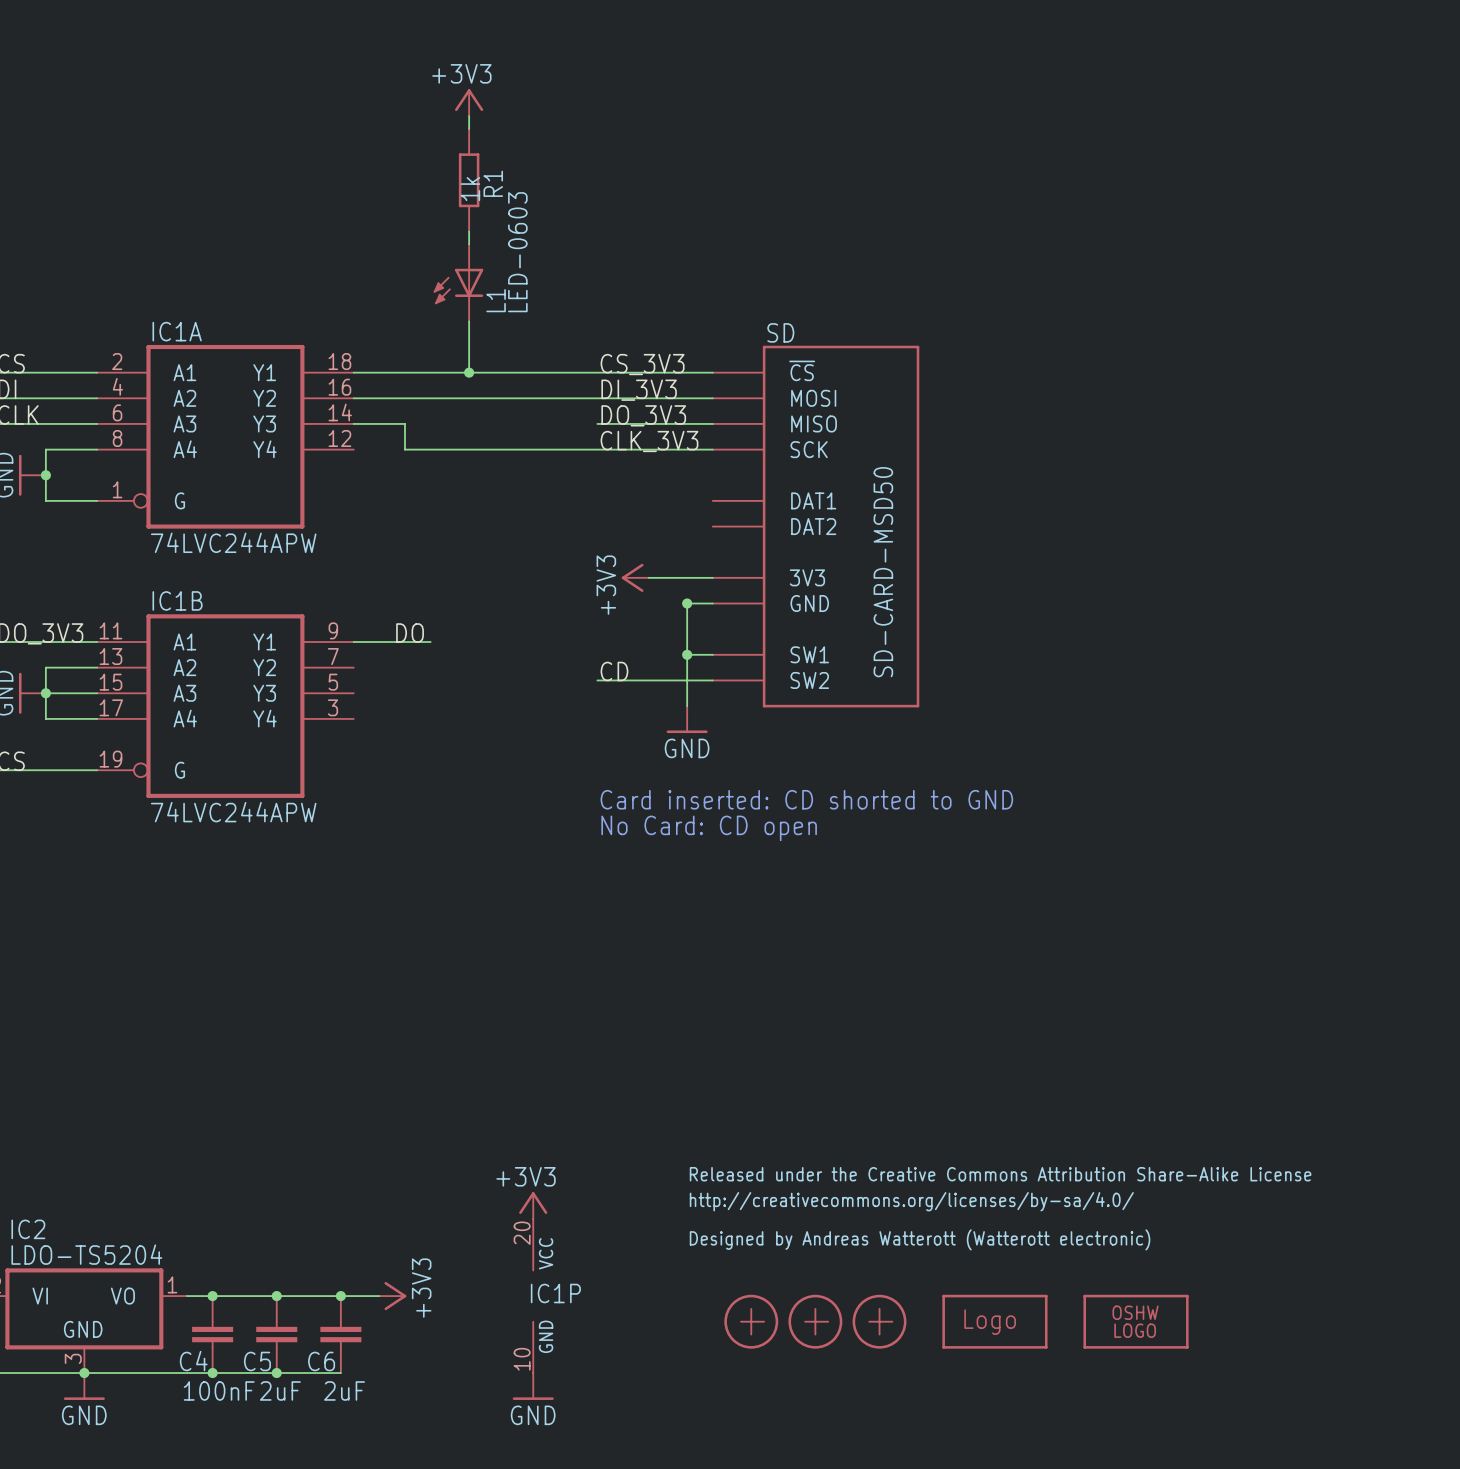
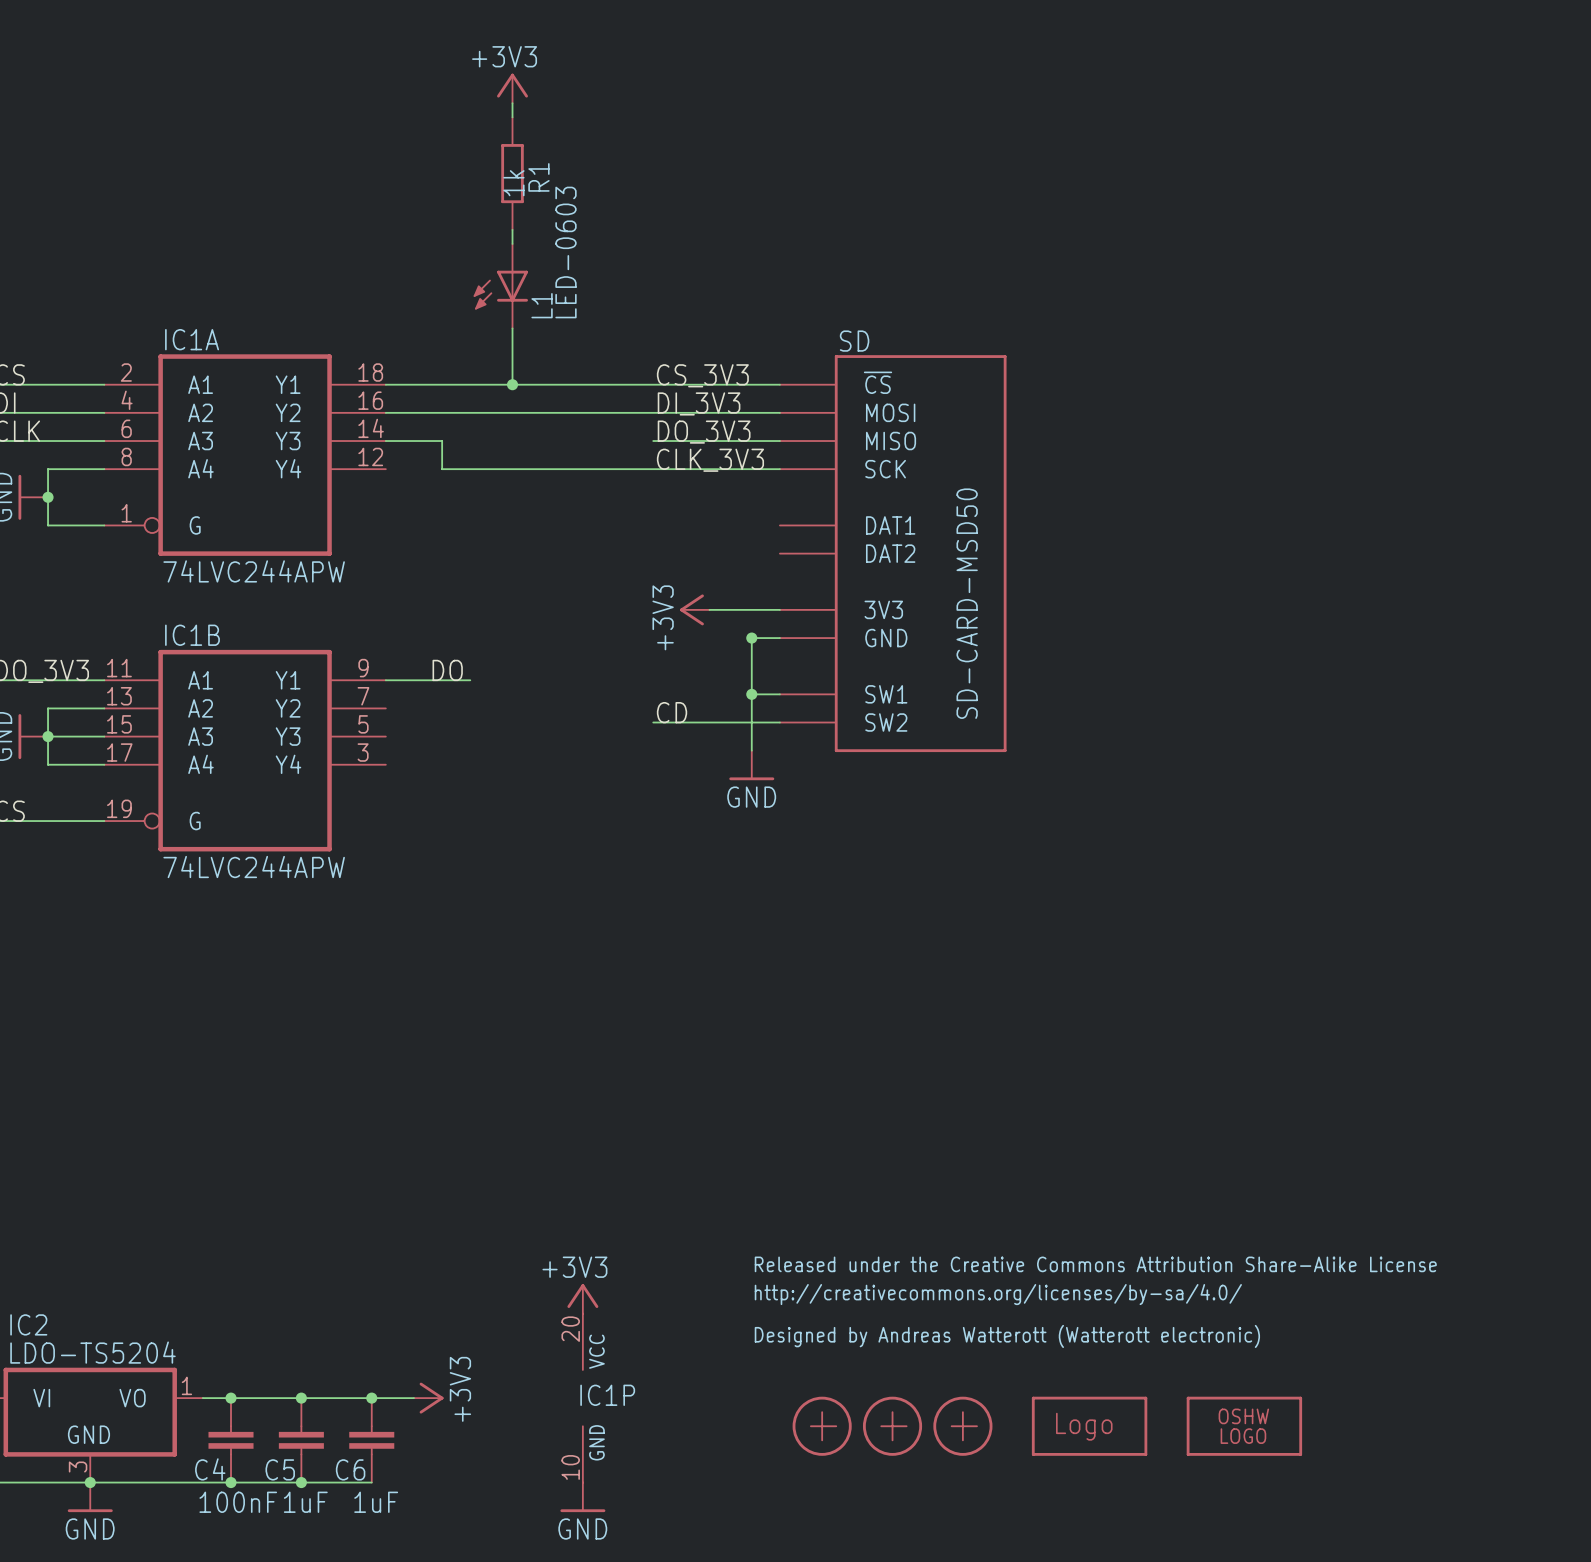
text: Card inserted: CD shorted to GND (806, 799) -> none
text: No Card: CD open (709, 828) -> none
C5 value: 2uF (280, 1390) -> 1uF (305, 1502)
C6 value: 2uF (344, 1390) -> 1uF (376, 1502)

